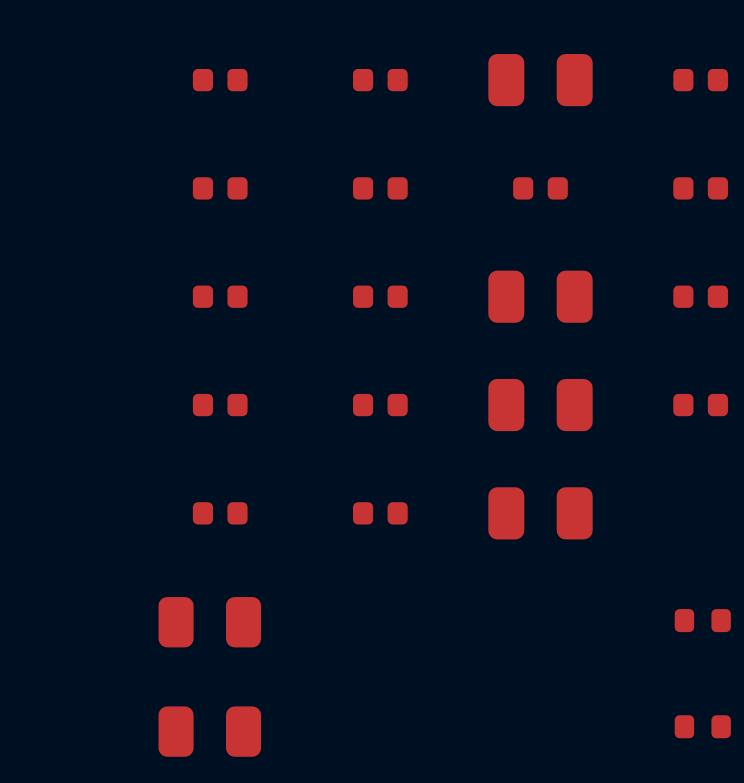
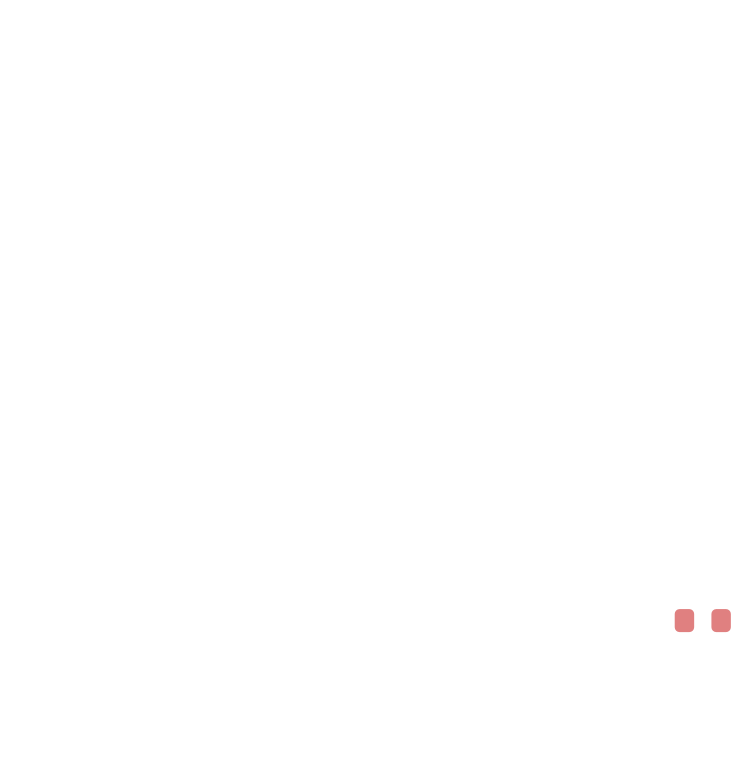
part: (220, 80) -> none
part: (380, 80) -> none
part: (540, 80) -> none
part: (700, 80) -> none
part: (220, 188) -> none
part: (380, 188) -> none
part: (540, 188) -> none
part: (700, 188) -> none
part: (220, 296) -> none
part: (380, 296) -> none
part: (540, 296) -> none
part: (700, 296) -> none
part: (220, 405) -> none
part: (380, 405) -> none
part: (540, 405) -> none
part: (700, 405) -> none
part: (220, 513) -> none
part: (380, 513) -> none
part: (540, 513) -> none
part: (209, 622) -> none
part: (702, 726) -> none
part: (209, 731) -> none

